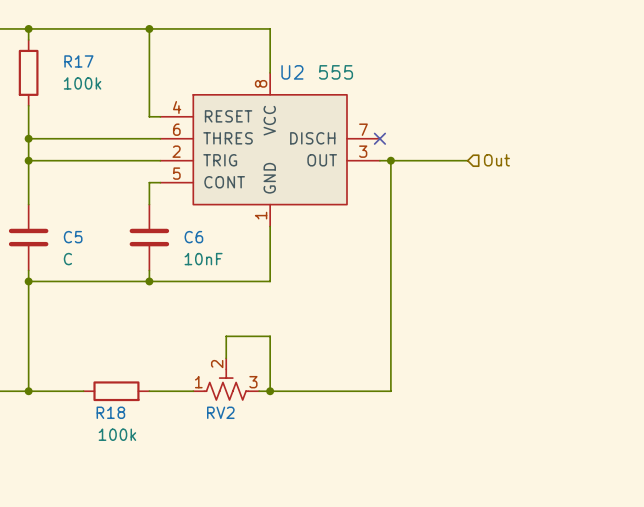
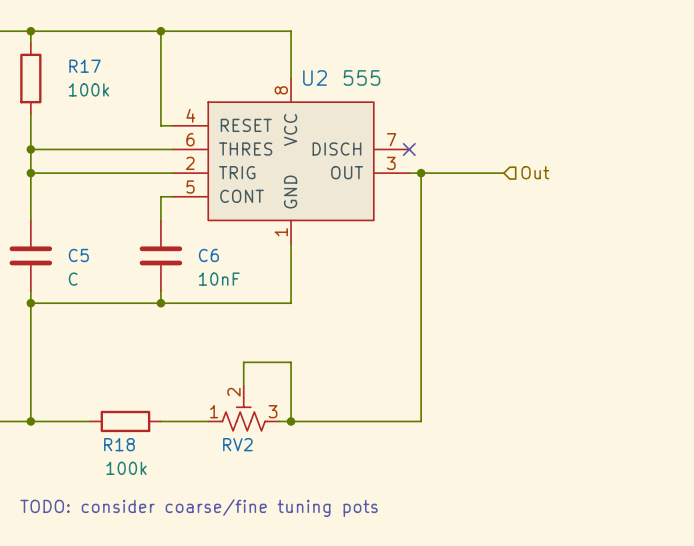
text: none -> TODO: consider coarse/fine tuning pots (199, 508)

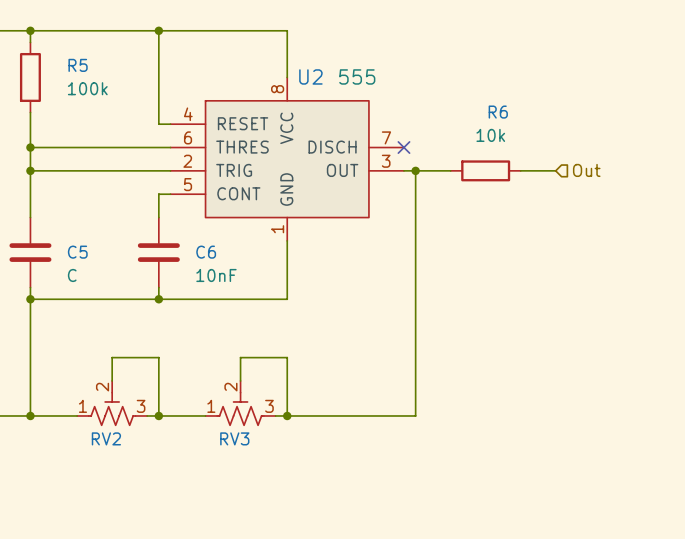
R17 name: R17 (85, 66) -> R5 (78, 65)
hierarchical label position: Out (535, 172) -> Out (586, 170)
wire: (456, 173) (503, 173) -> none
R6: none -> 10k (485, 170)
wire: none -> (520, 170) (555, 170)
wire: none -> (112, 380) (112, 357) (158, 357) (158, 415) (147, 415)
RV2: none -> (112, 403)
R18: 100k (125, 421) -> none
junction: none -> (158, 415)
RV2 name: RV2 (237, 444) -> RV3 (234, 438)
text: TODO: consider coarse/fine tuning pots (199, 508) -> none

